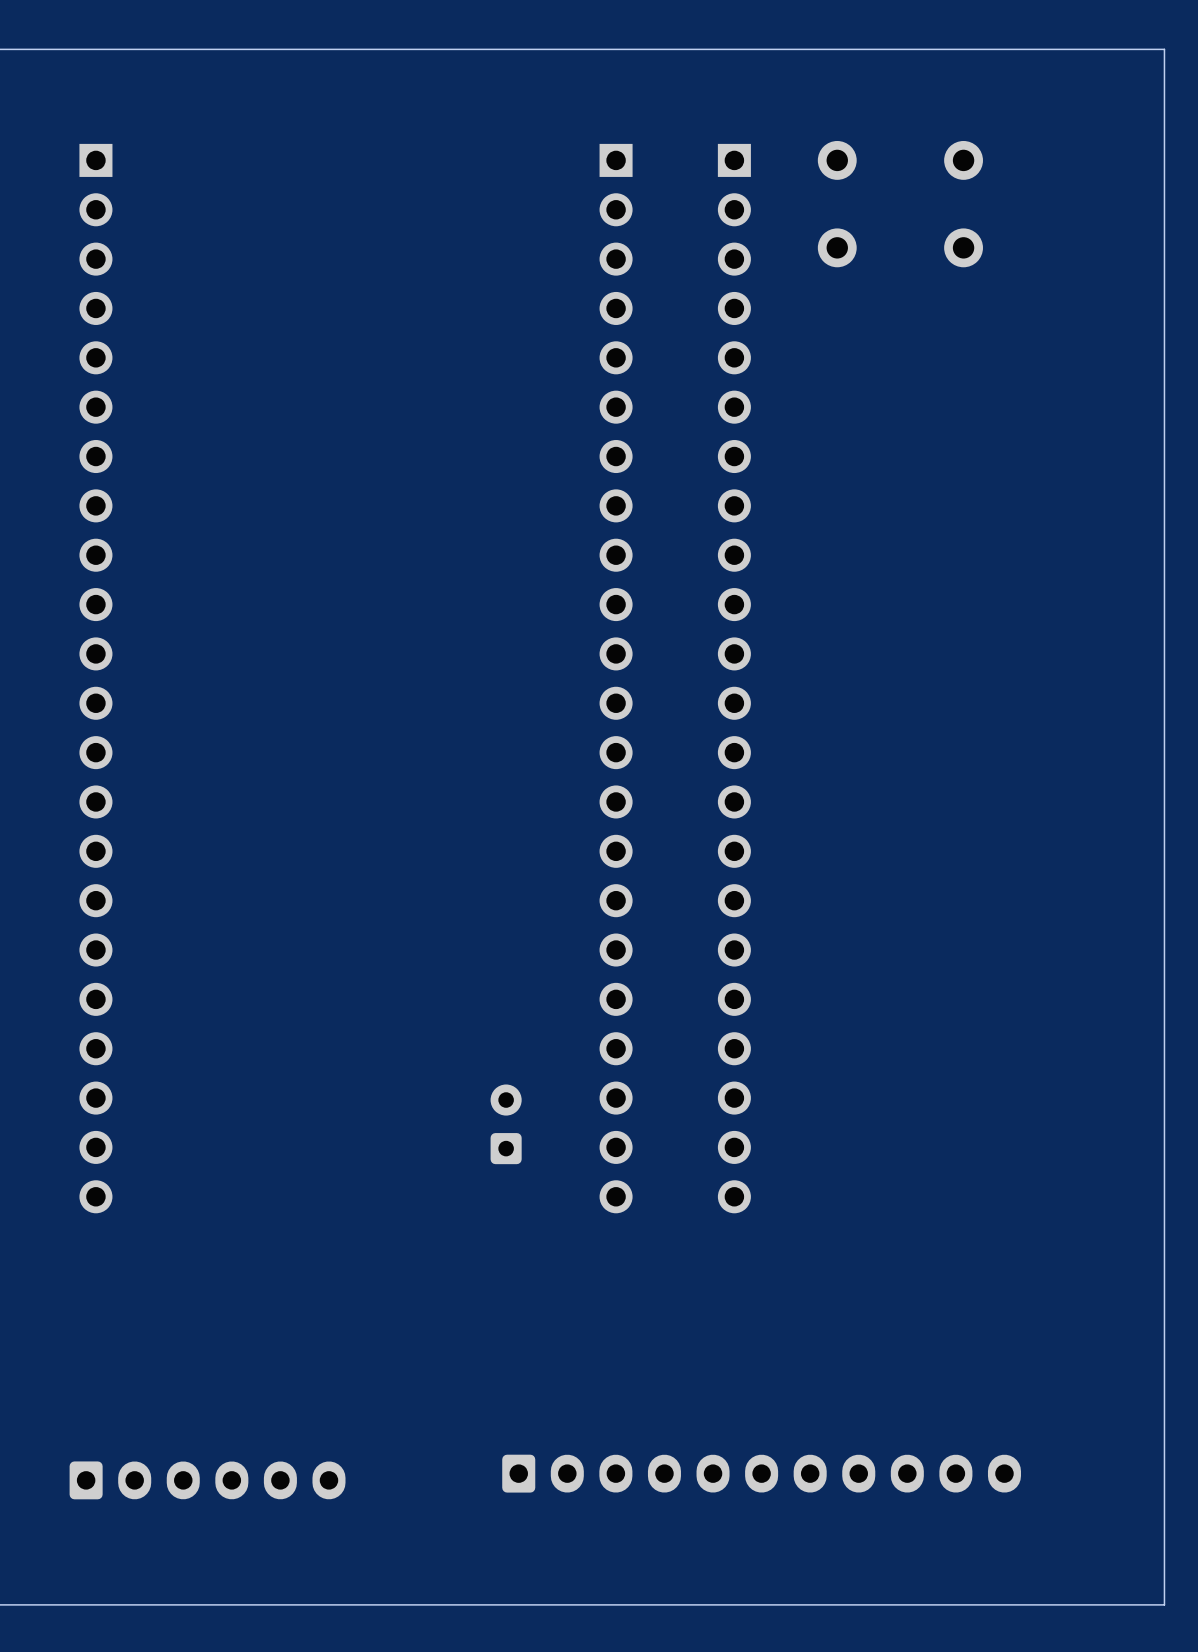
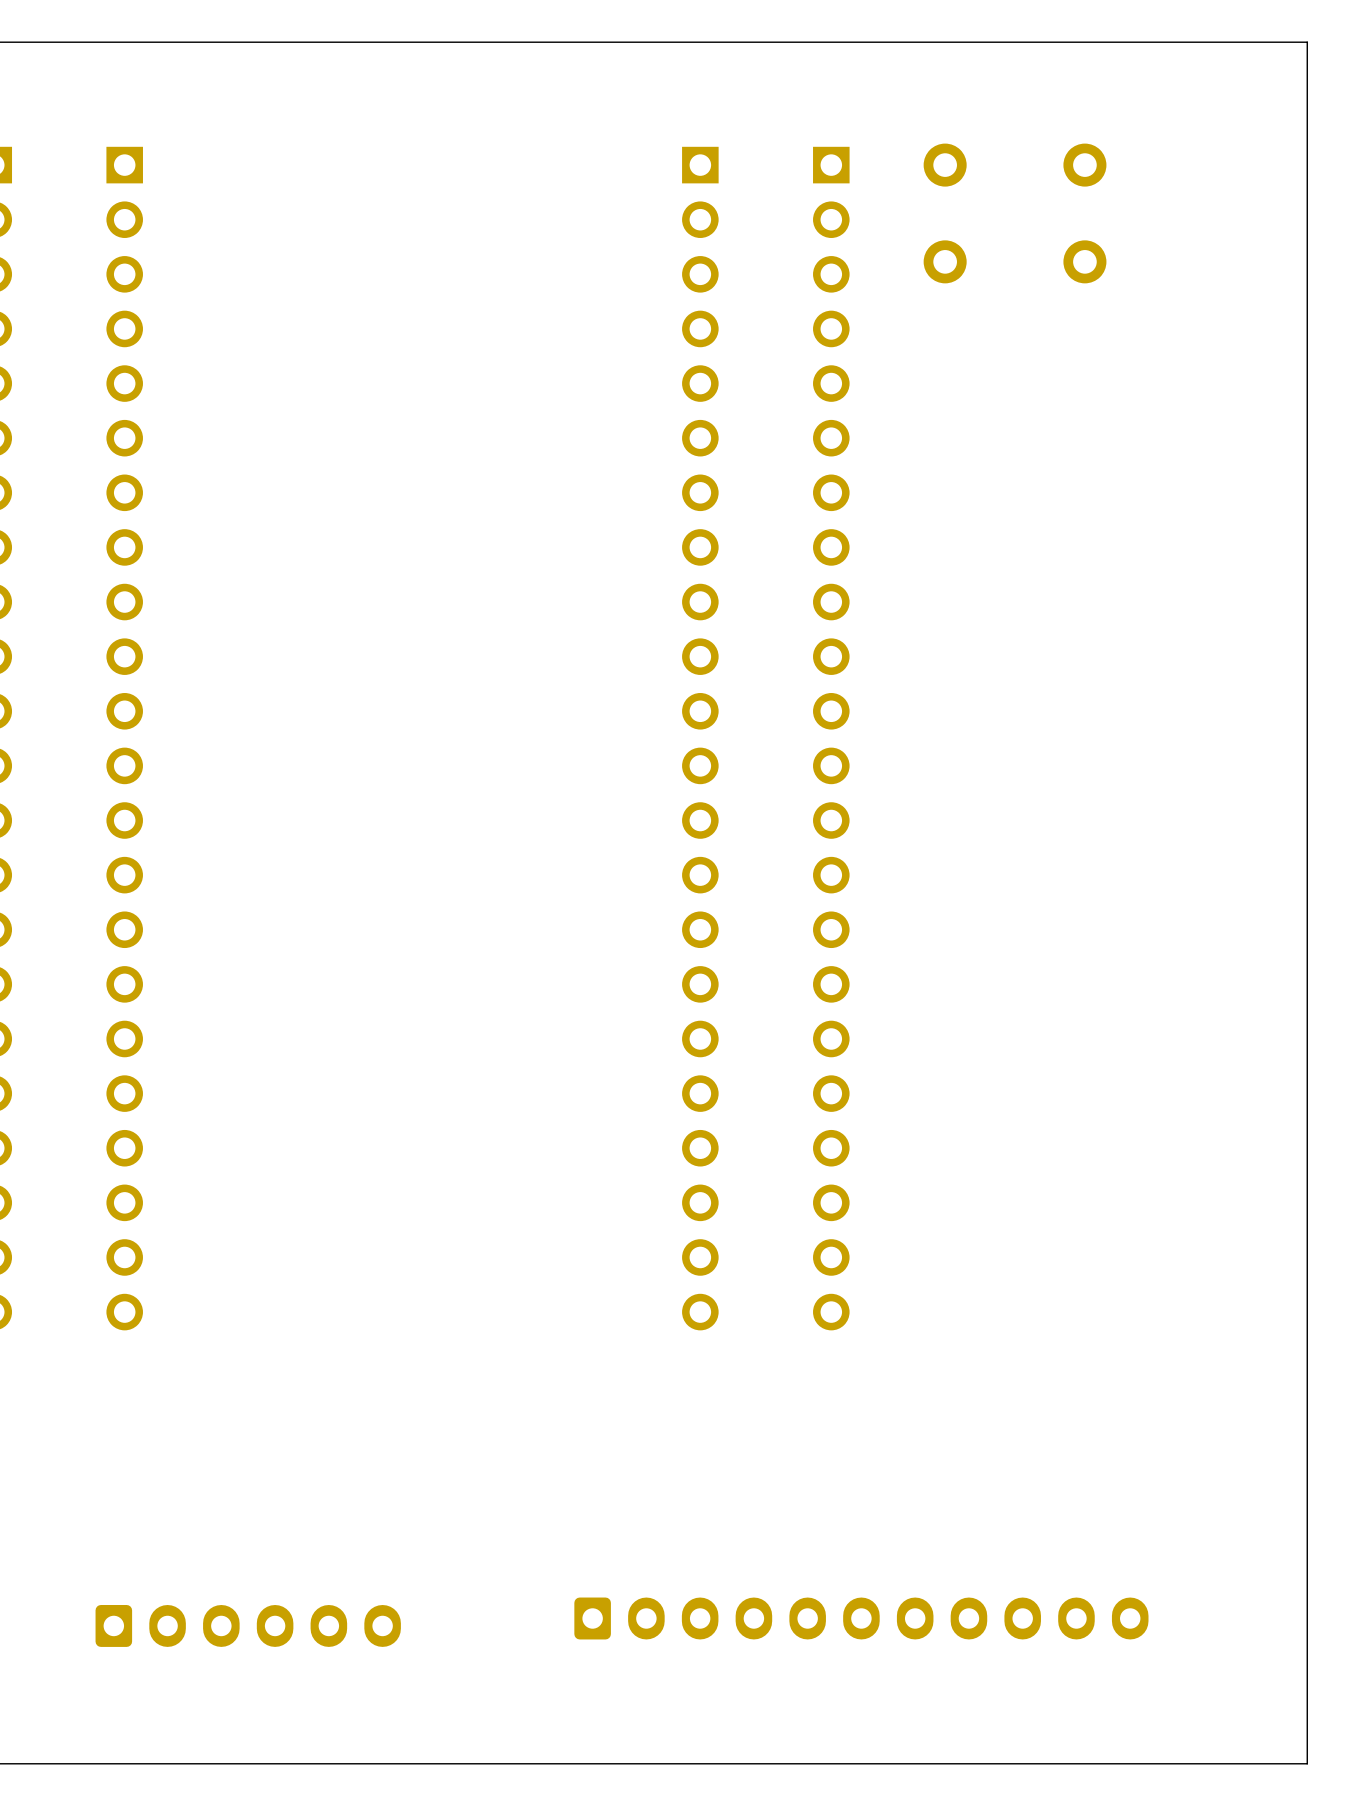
part: (506, 1124) -> none

